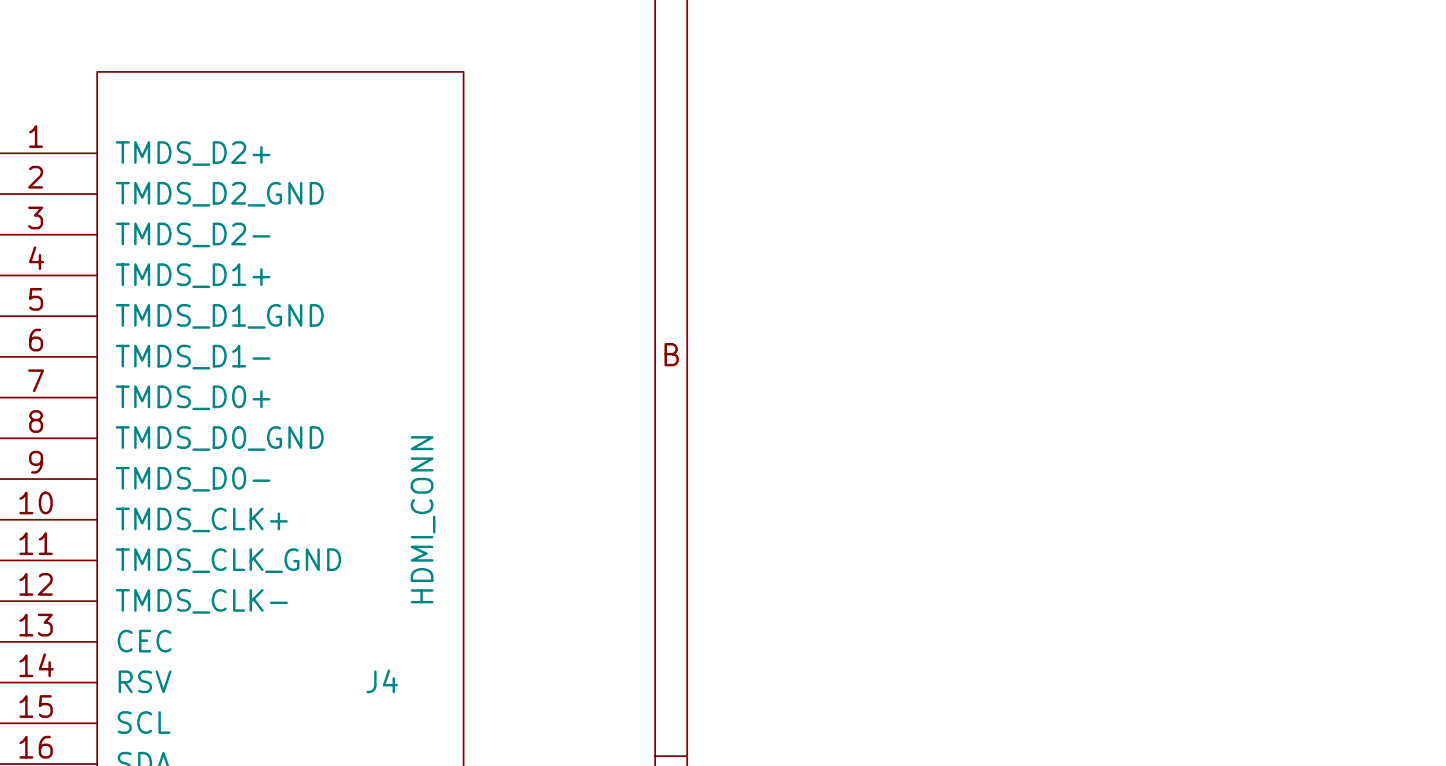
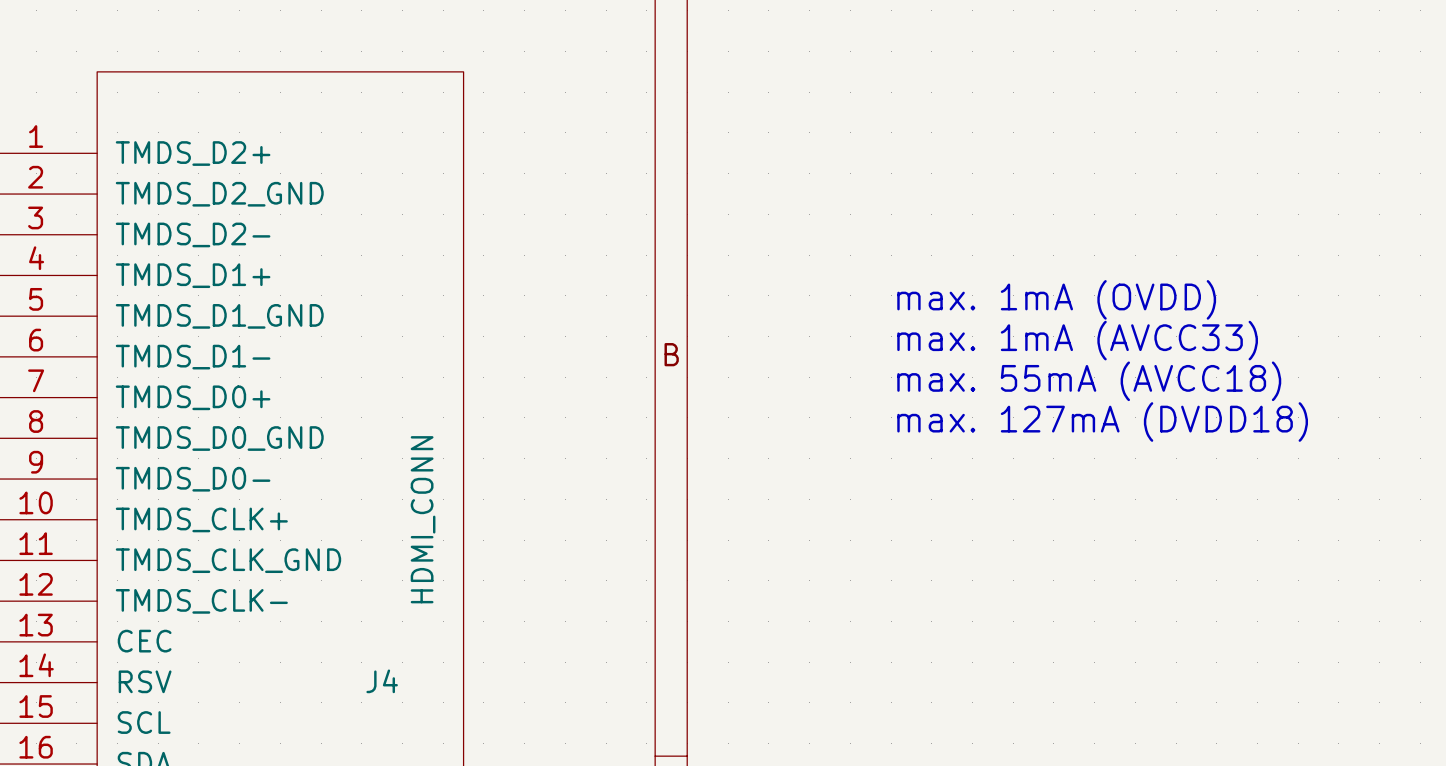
text: none -> max. 1mA (OVDD) (1056, 299)
text: none -> max. 1mA (AVCC33) (1077, 340)
text: none -> max. 55mA (AVCC18) (1089, 381)
text: none -> max. 127mA (DVDD18) (1102, 422)

